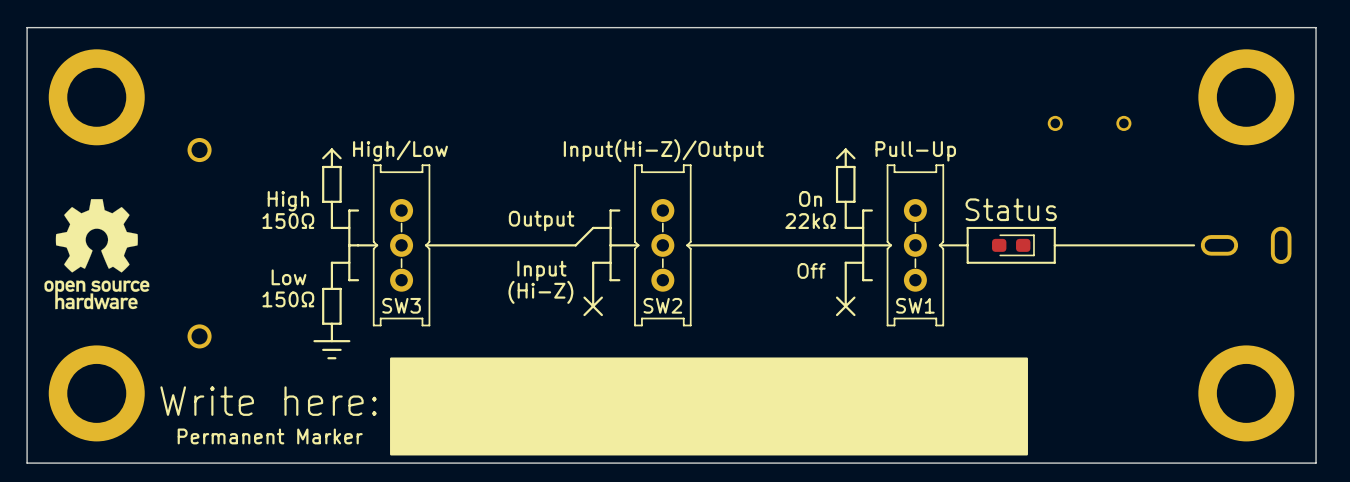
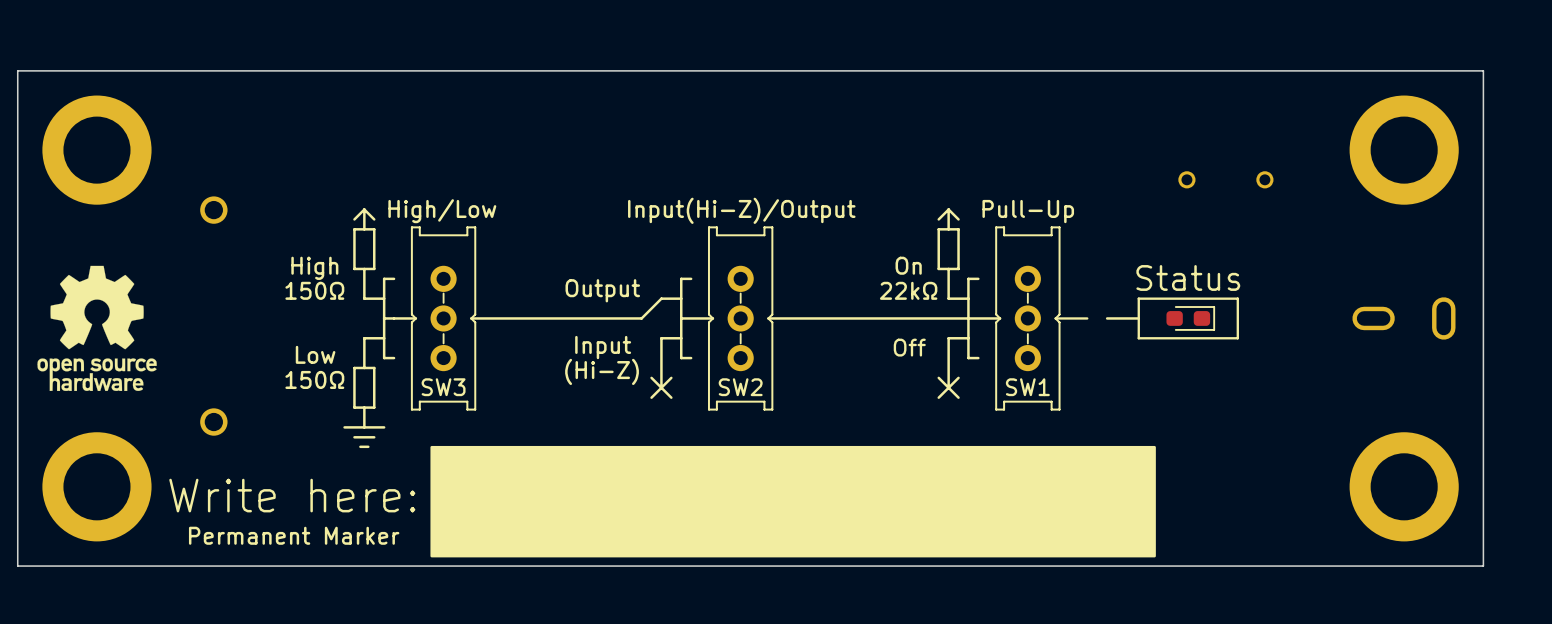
text position: Status (1011, 209) -> Status (1188, 277)
line: (1012, 227) (967, 227) (967, 262) (1012, 262) -> (1138, 298) (1138, 338)
line: (1054, 227) (1054, 262) -> (1186, 298) (1237, 298) (1237, 338) (1186, 338)
line: none -> (1107, 318) (1138, 318)
part position: (1013, 245) -> (1190, 318)
line: (1054, 245) (1194, 245) -> none

